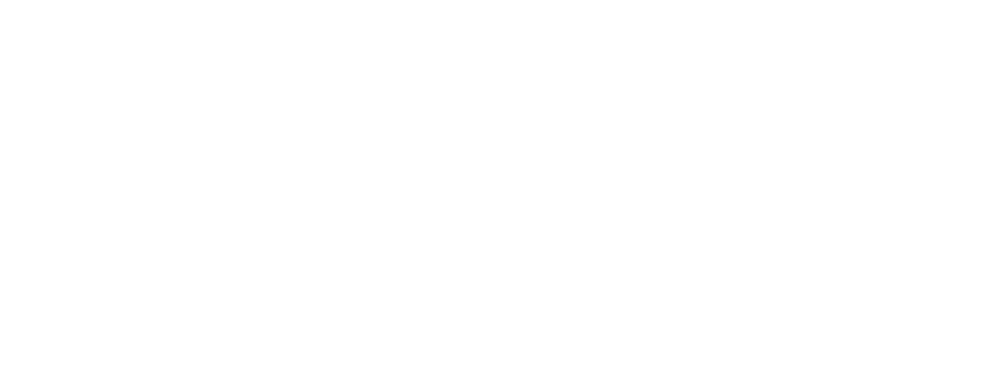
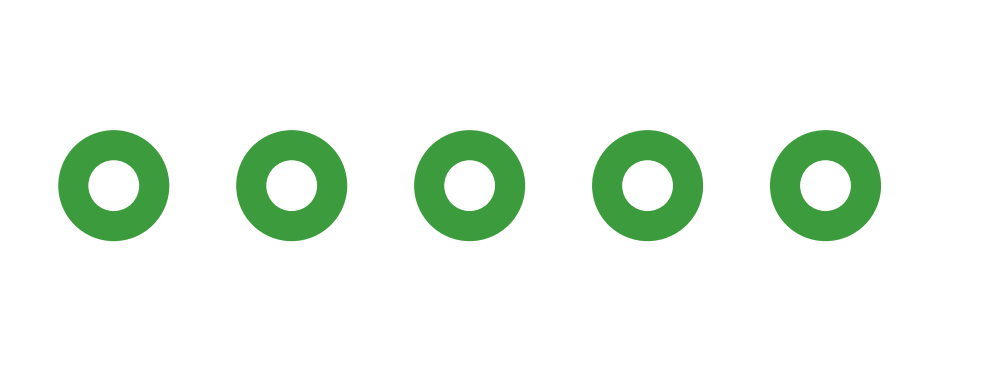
part: none -> (469, 185)

